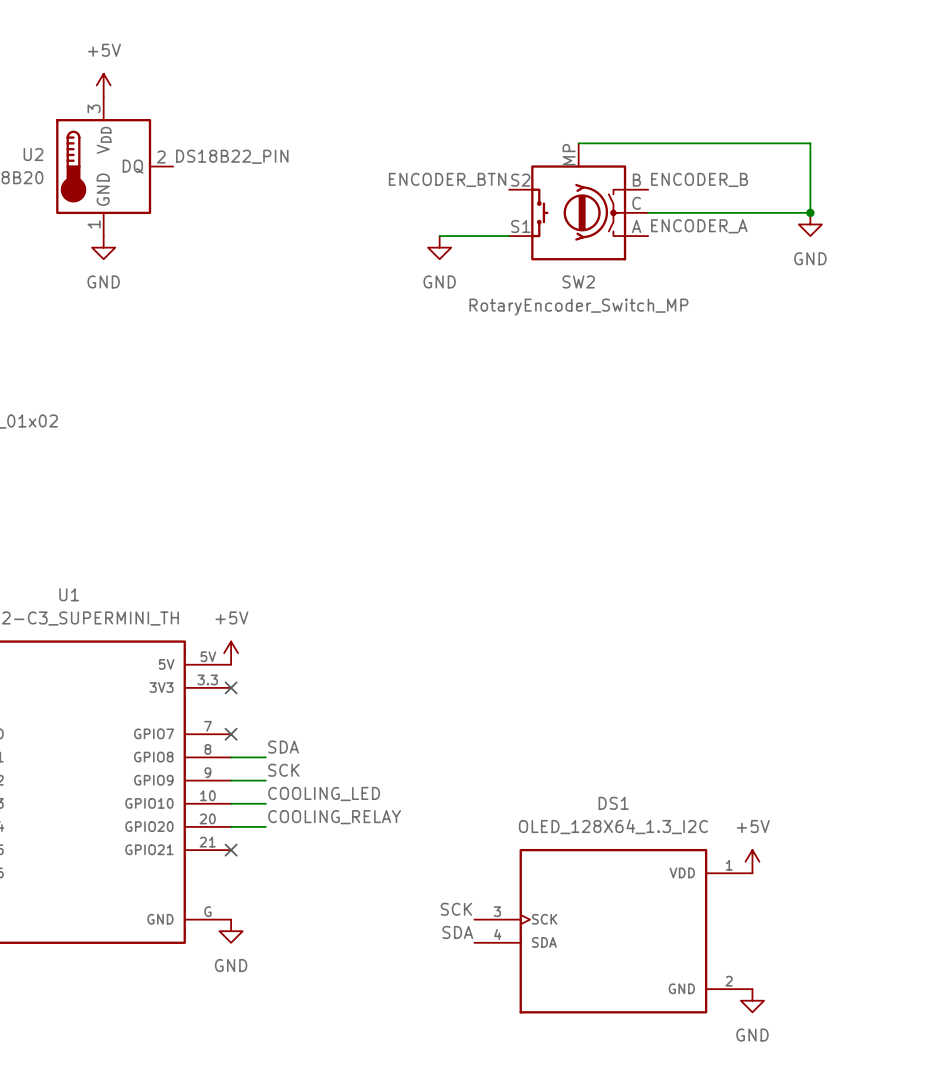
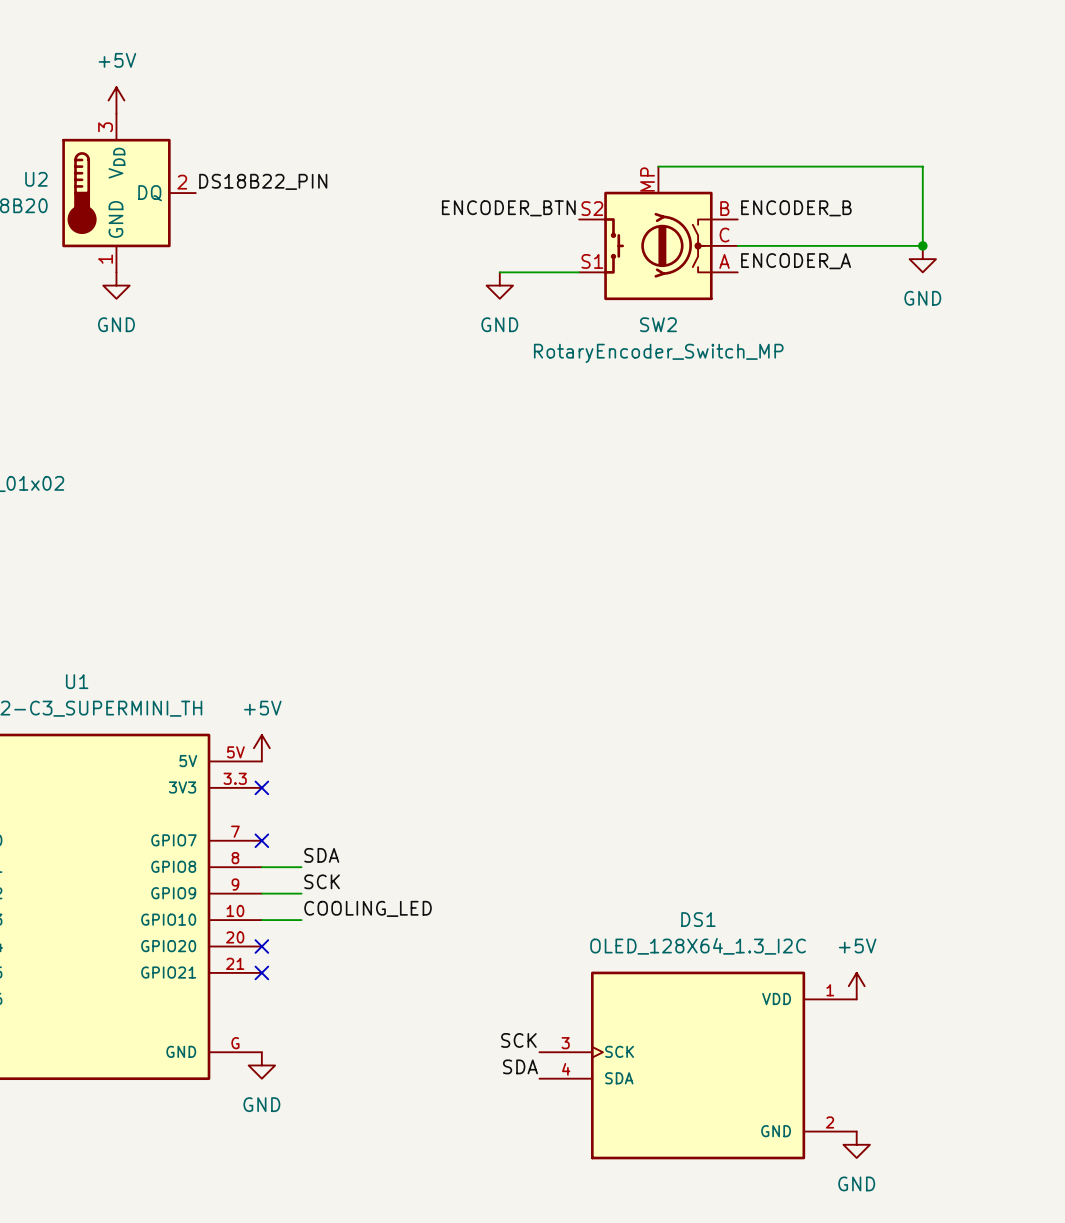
label: COOLING_RELAY (334, 817) -> none
wire: (231, 826) (265, 826) -> none
no-connect mark: none -> (261, 946)

